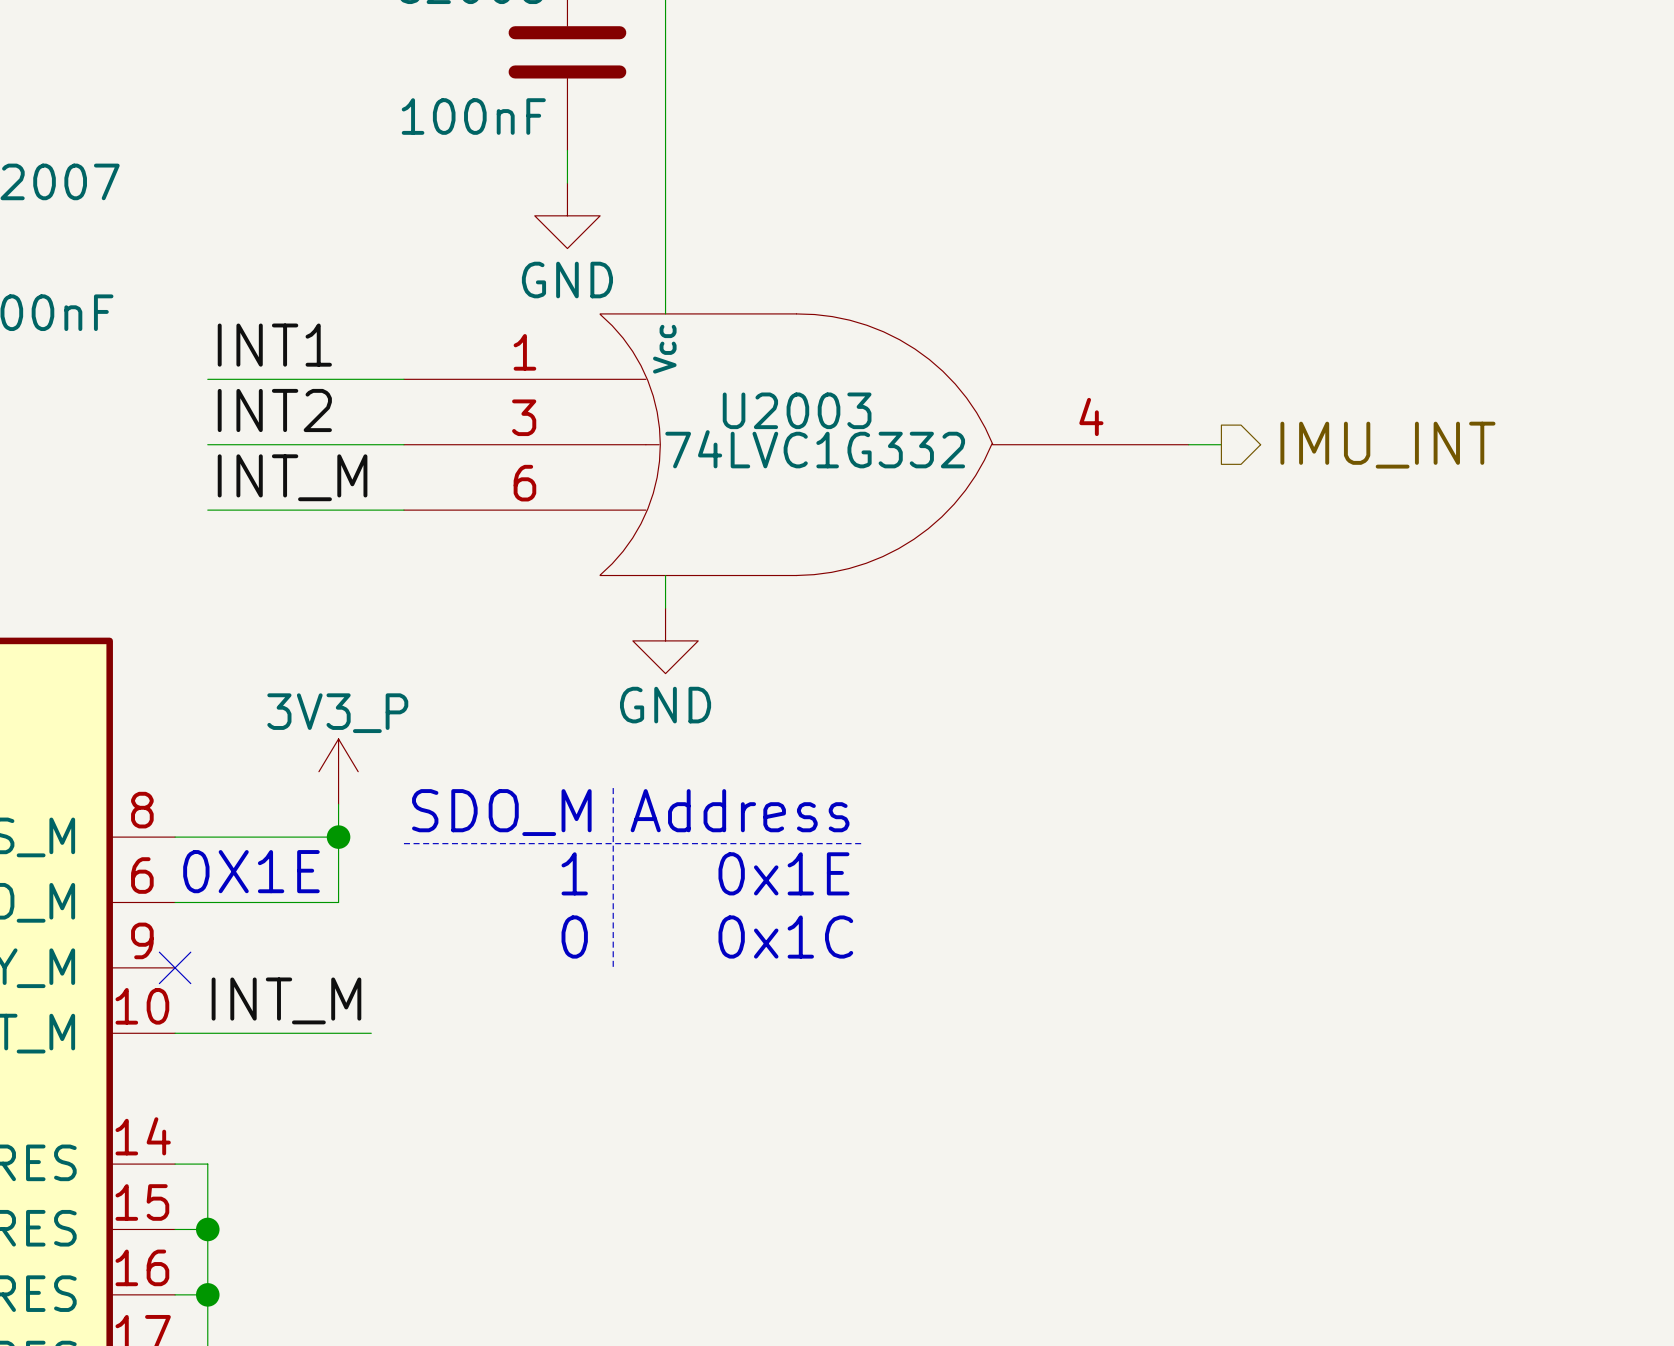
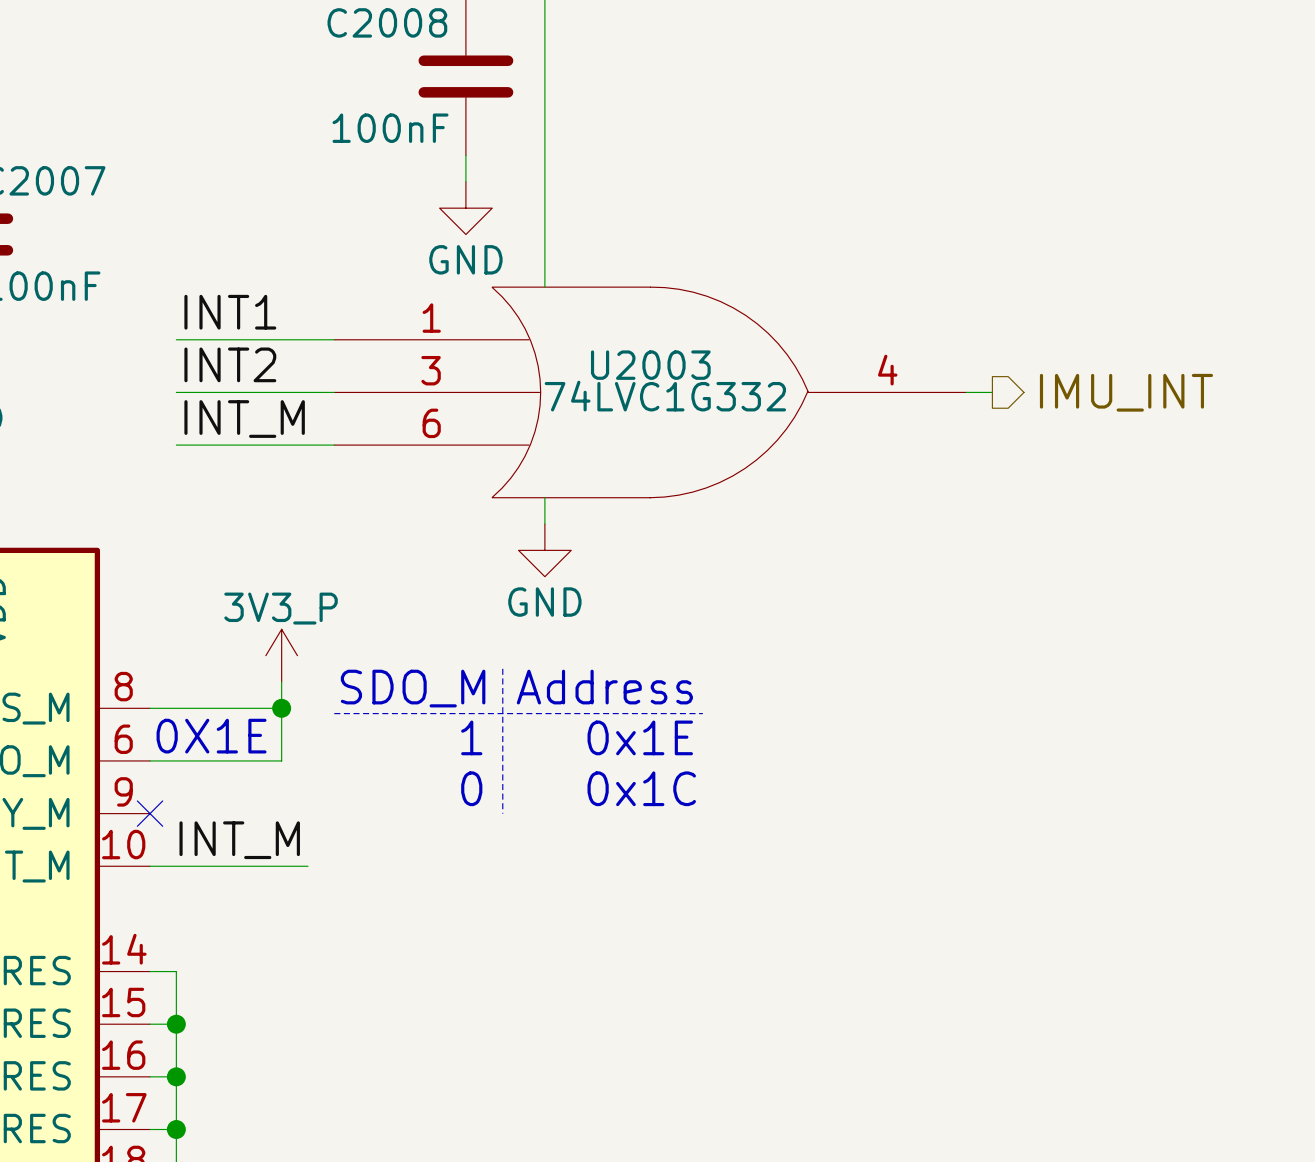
U2003 pin name: Vcc (664, 349) -> none

